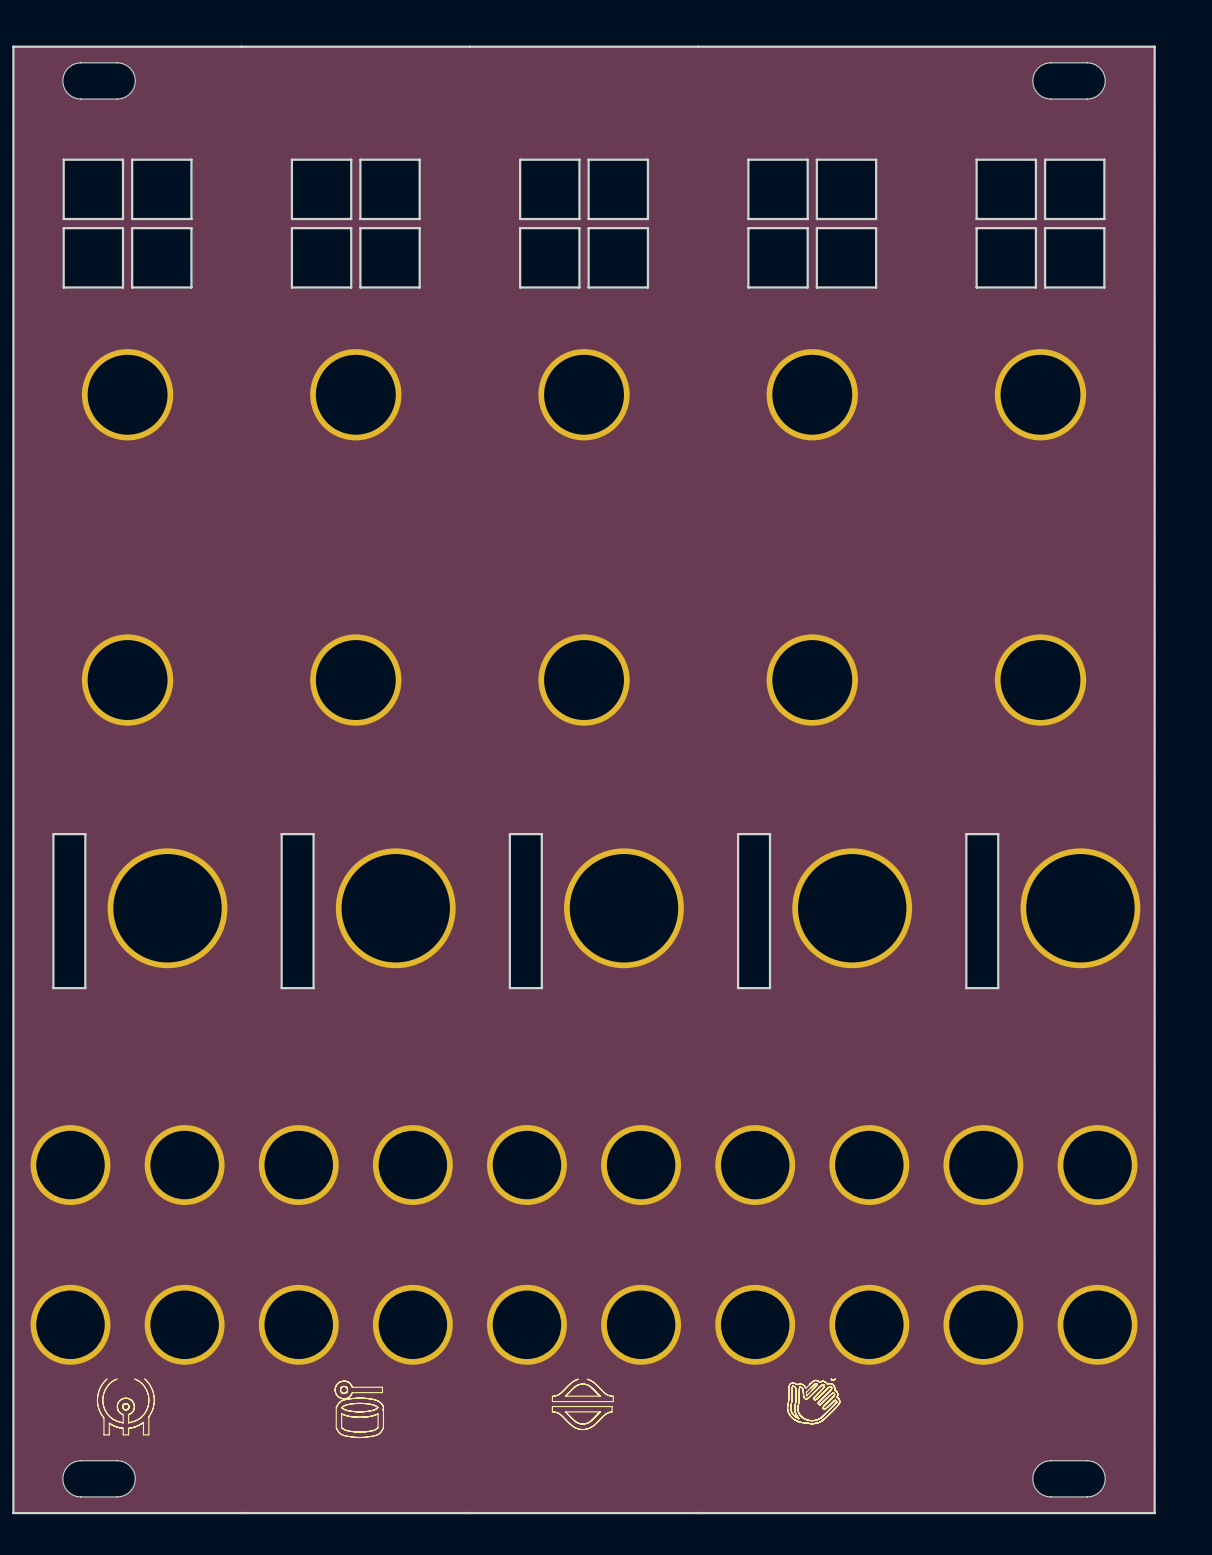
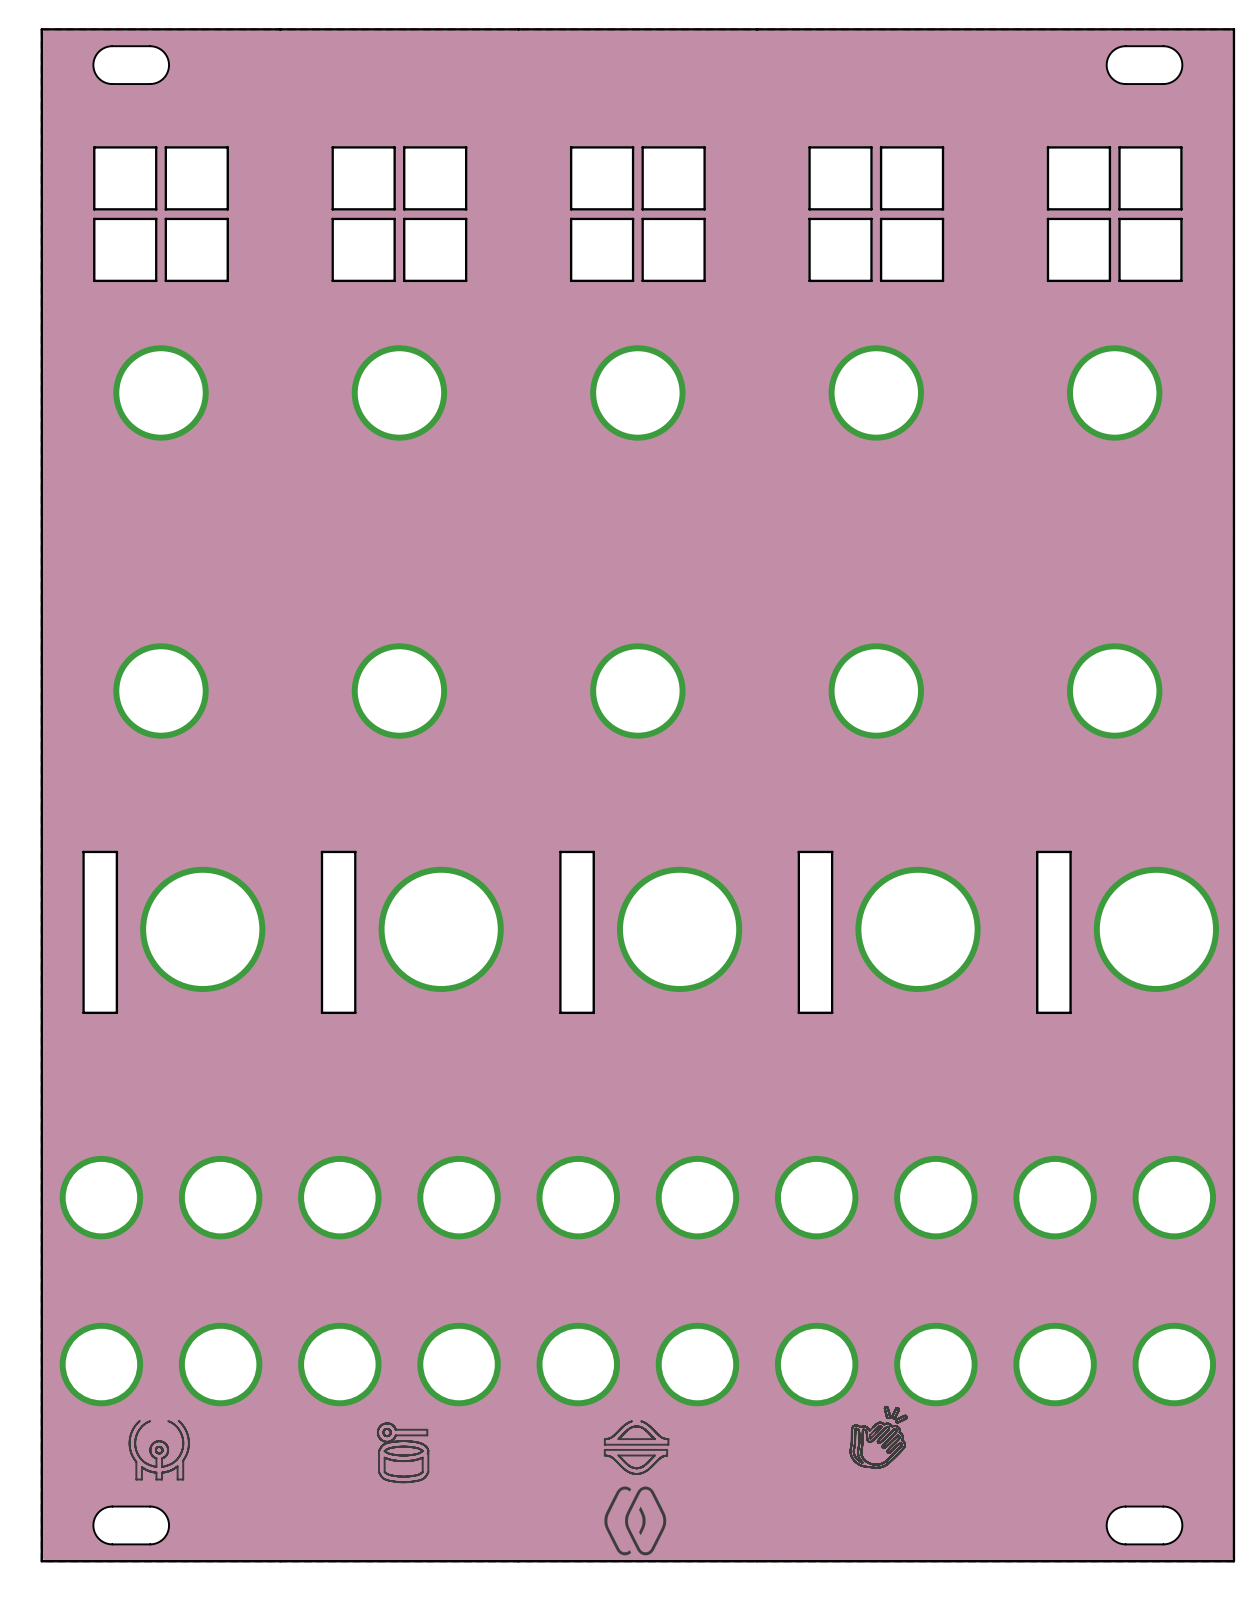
line: none -> (888, 1411) (888, 1412)
line: none -> (887, 1417) (887, 1418)
drawing: none -> [604, 1486, 667, 1556]

